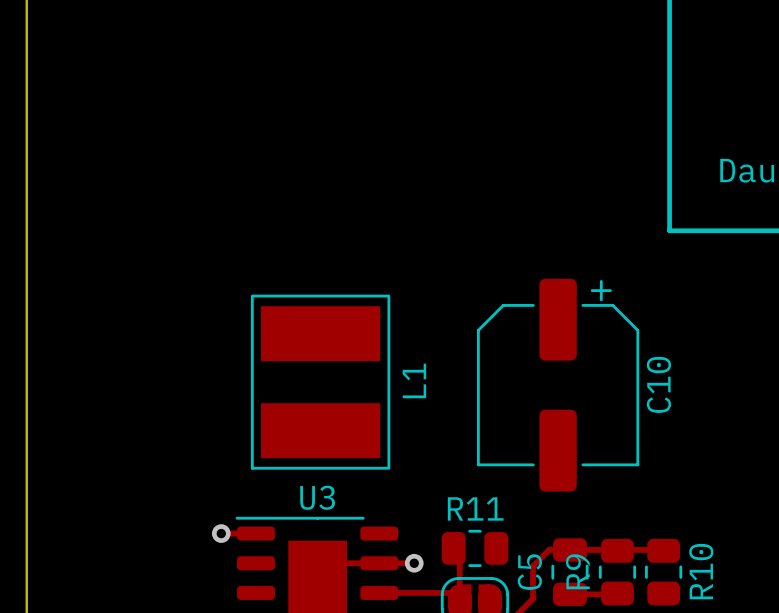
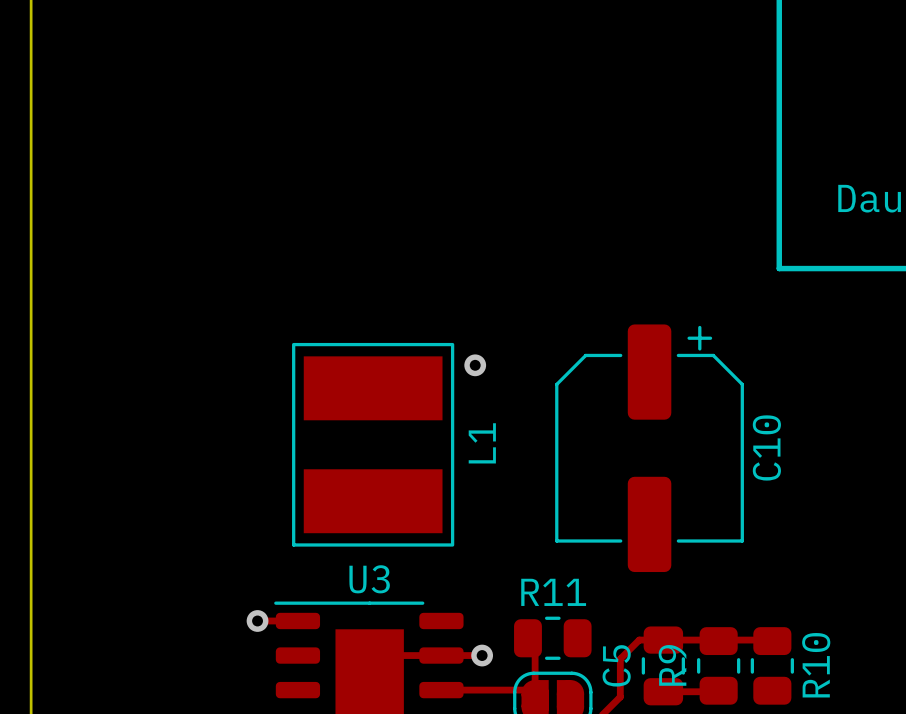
via: none -> (475, 365)

